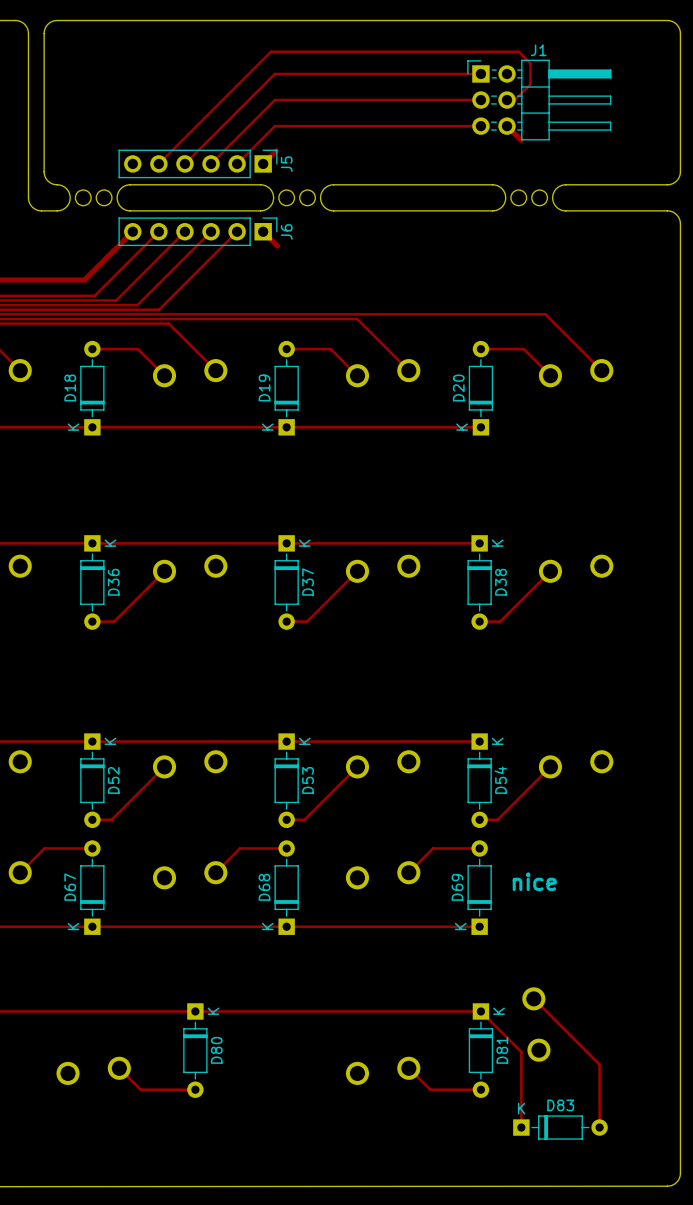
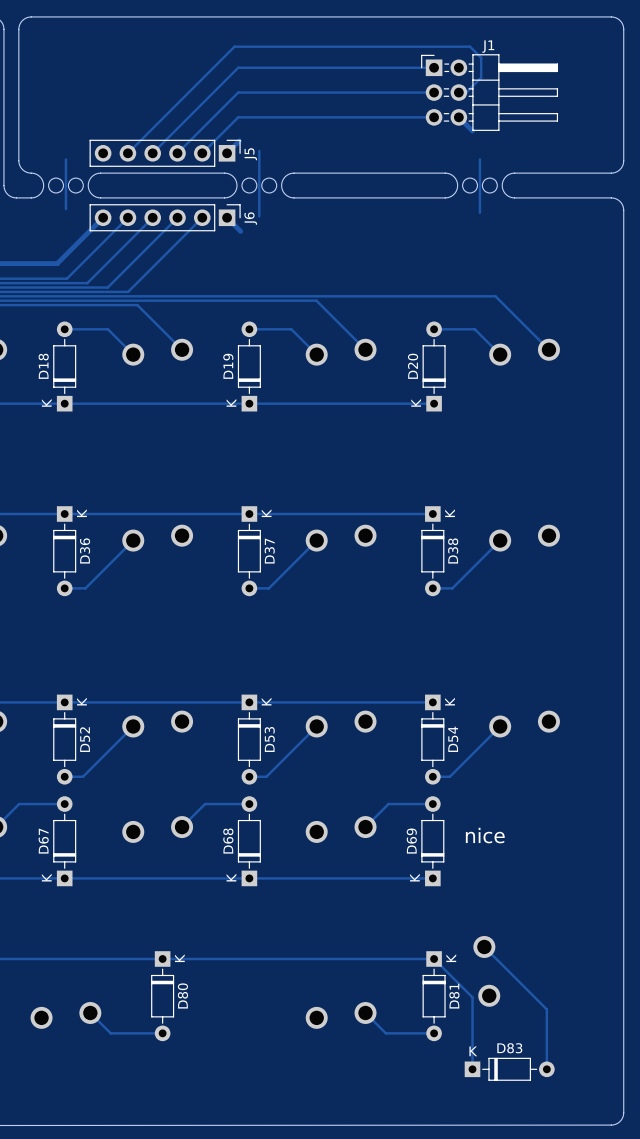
track: none -> (259, 150) (259, 216)
track: none -> (65, 159) (65, 209)
track: none -> (479, 159) (479, 212)

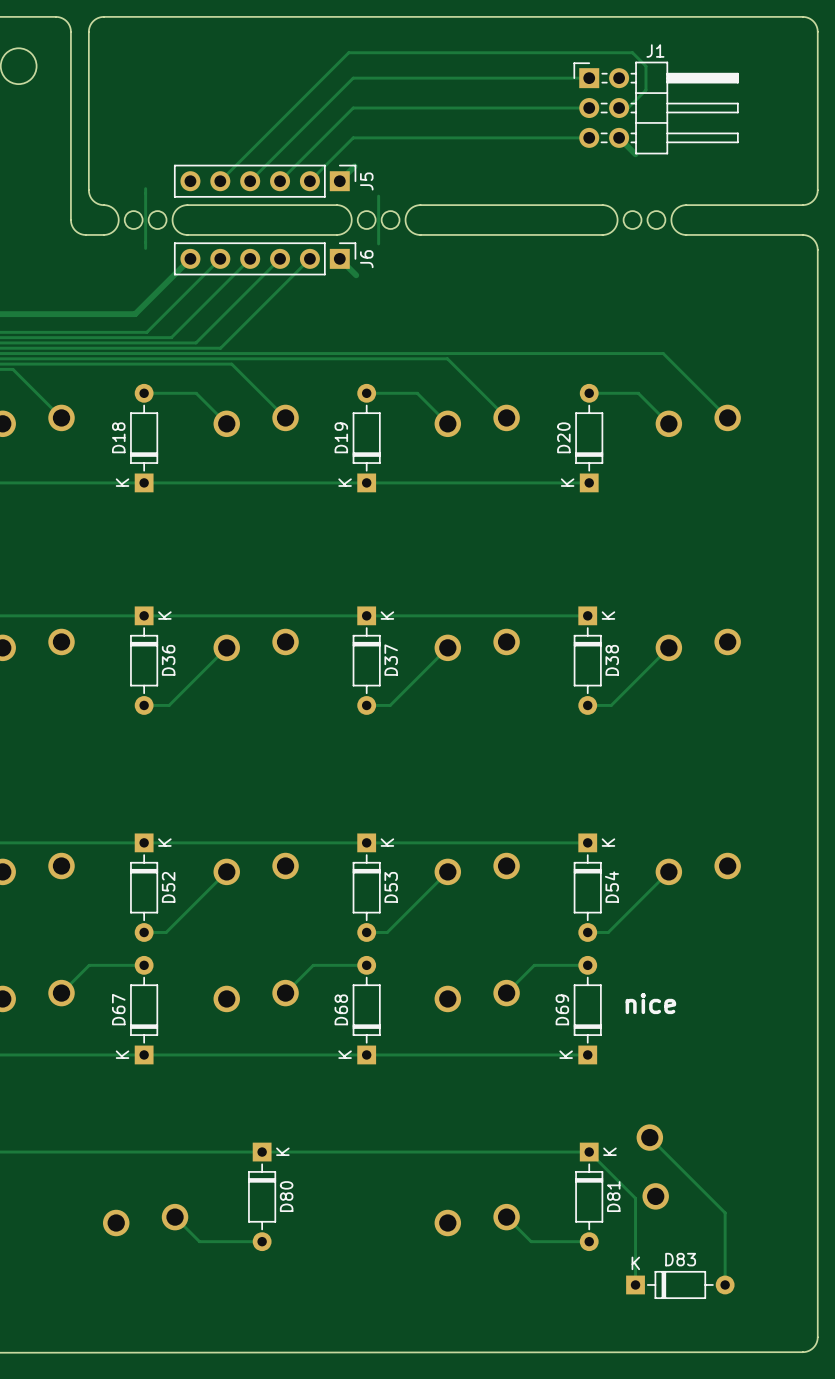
track: (259, 150) (259, 165) -> none
track: (479, 159) (479, 212) -> none
track: (259, 205) (259, 216) -> none

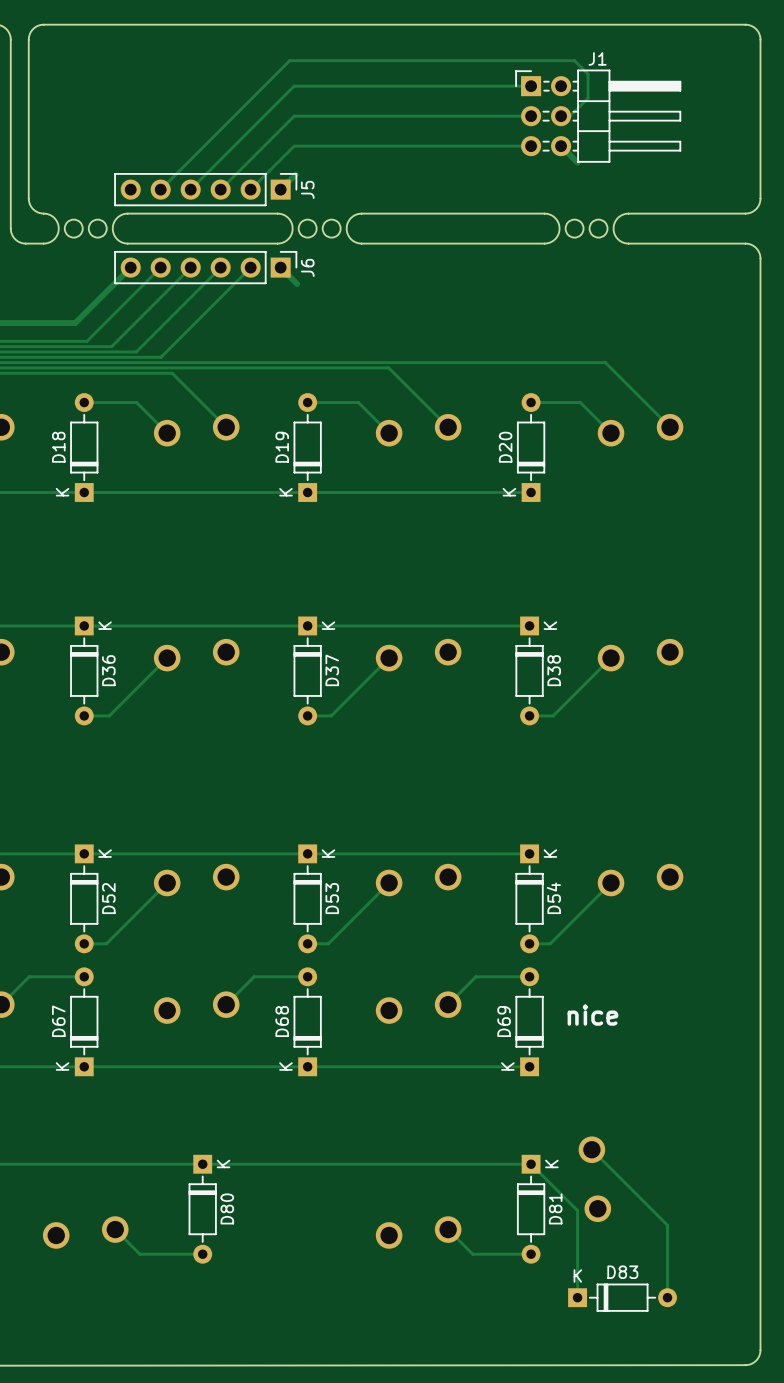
track: (145, 188) (145, 248) -> none
track: (378, 196) (378, 243) -> none

